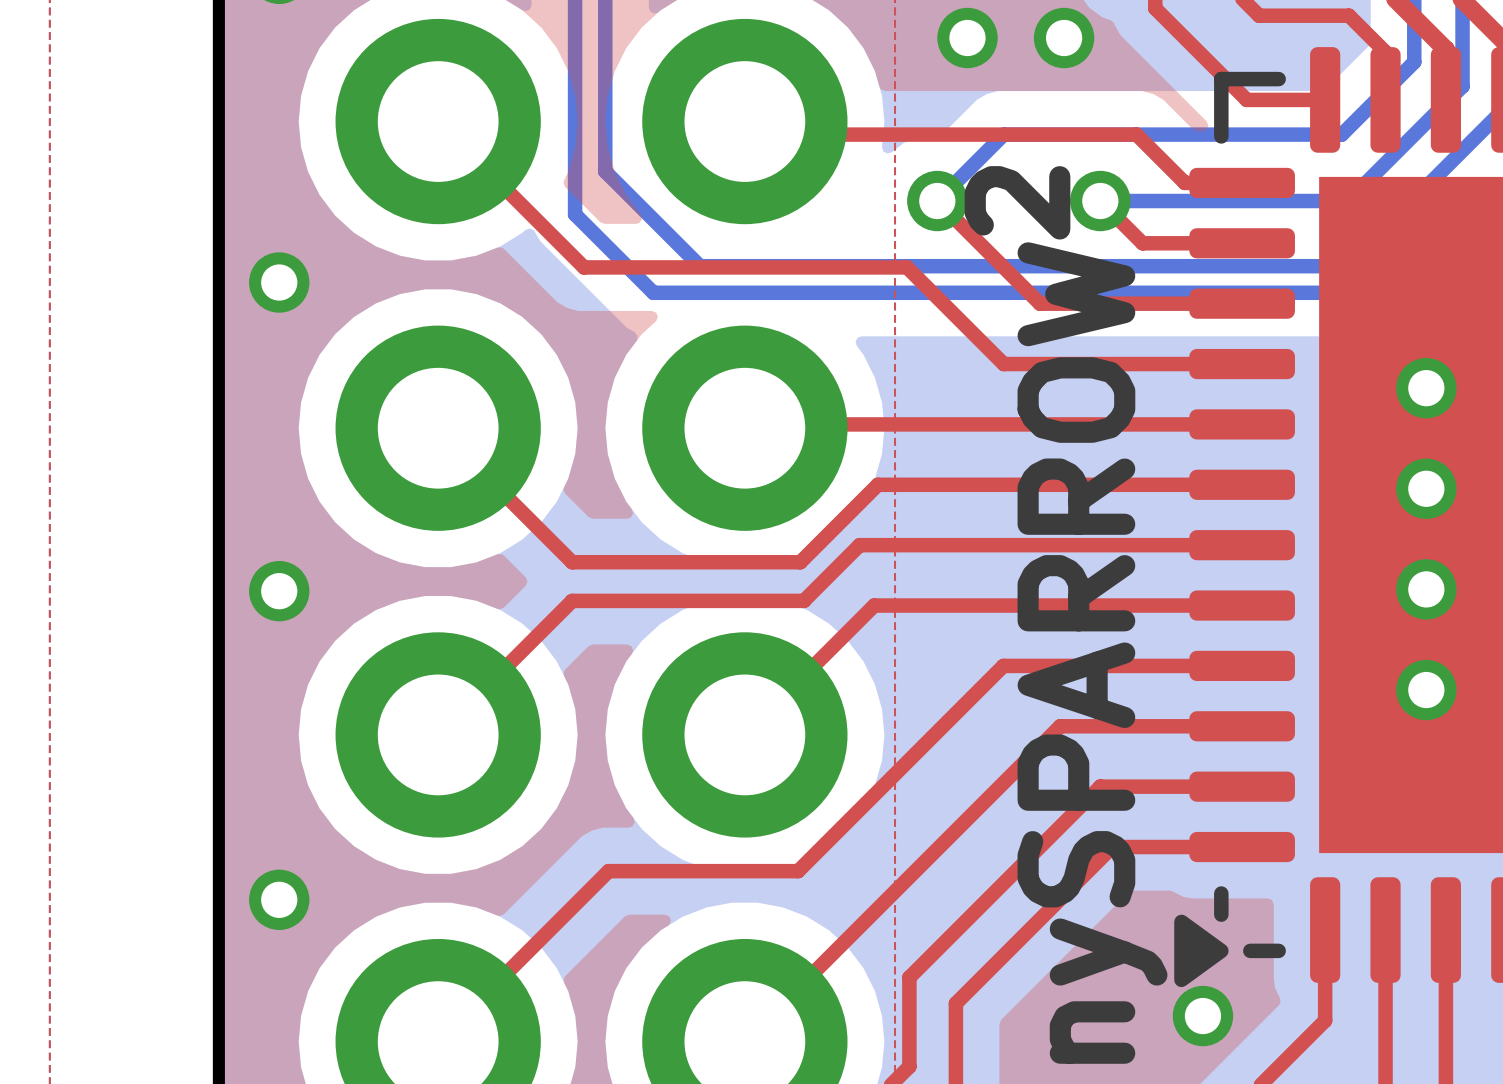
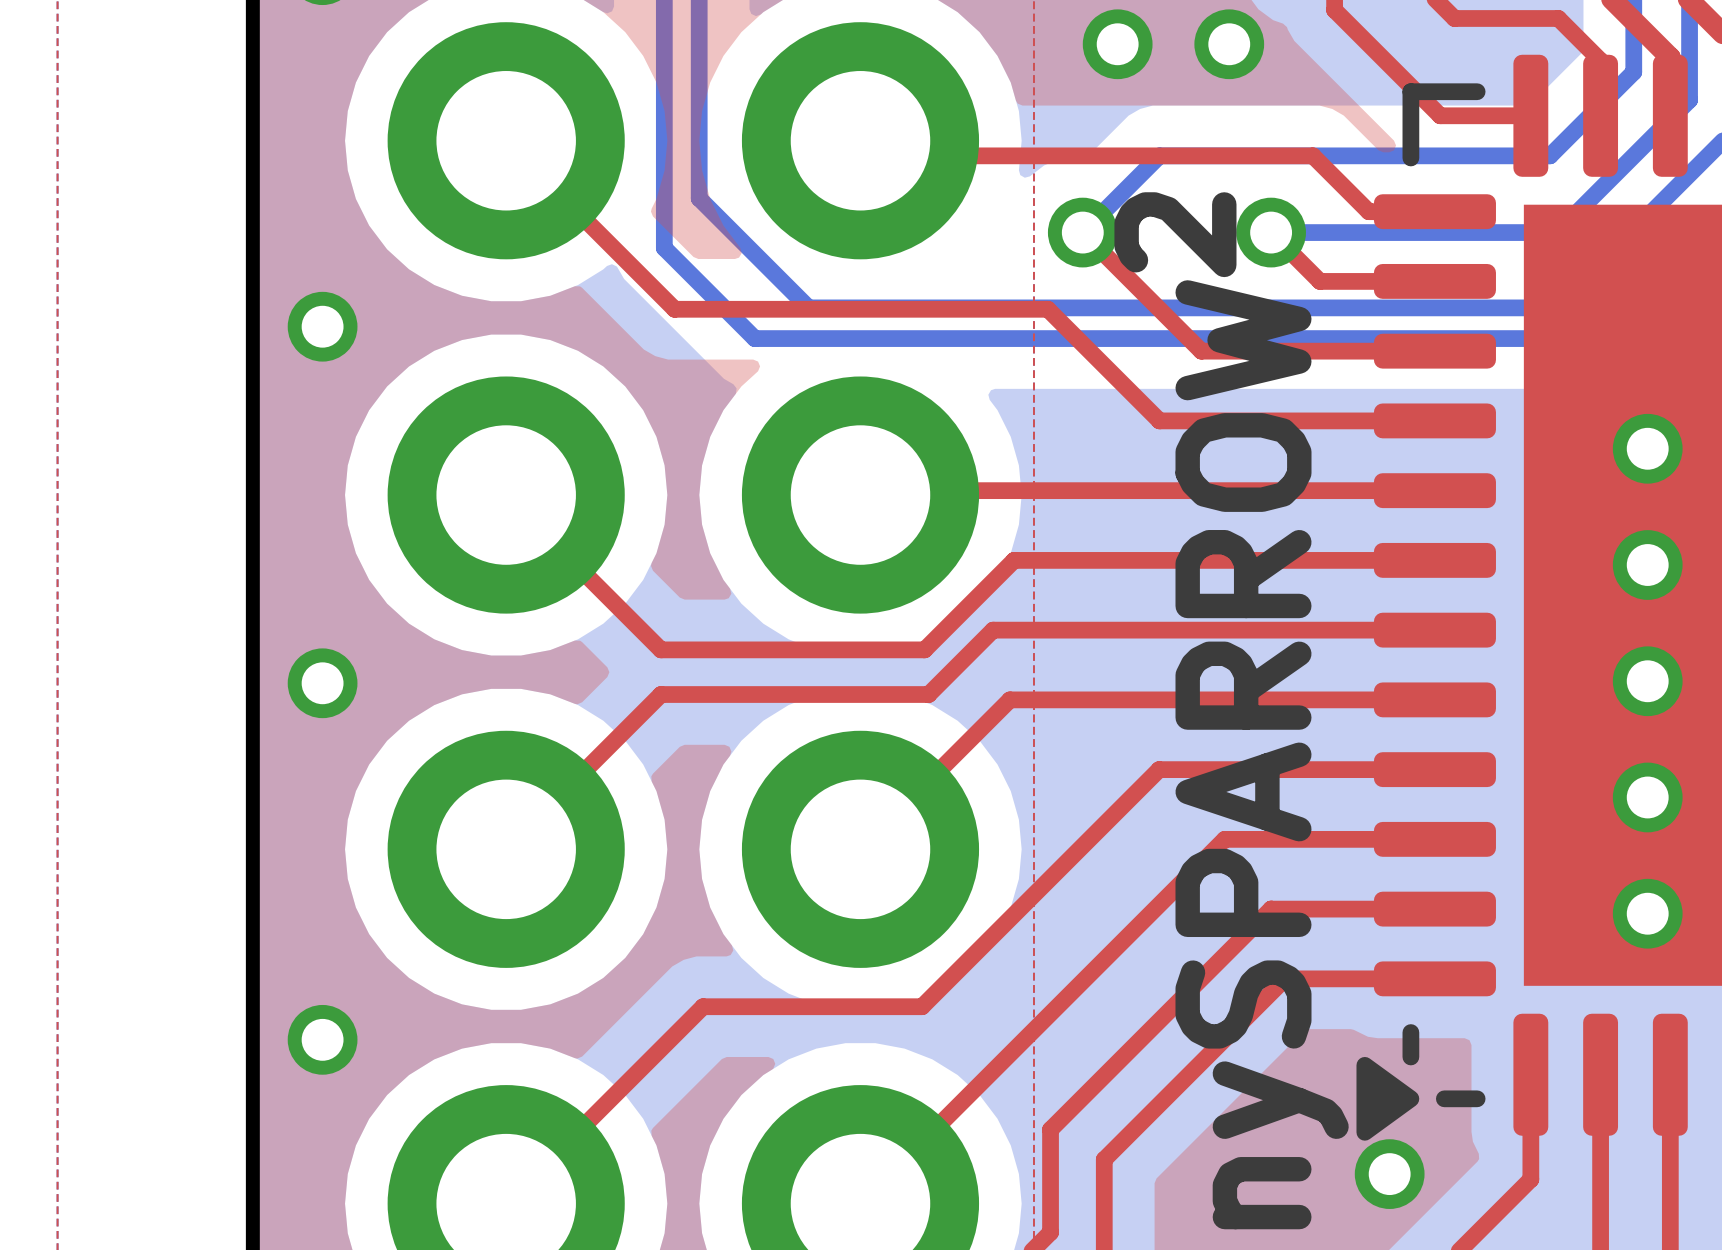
via: none -> (1647, 913)

